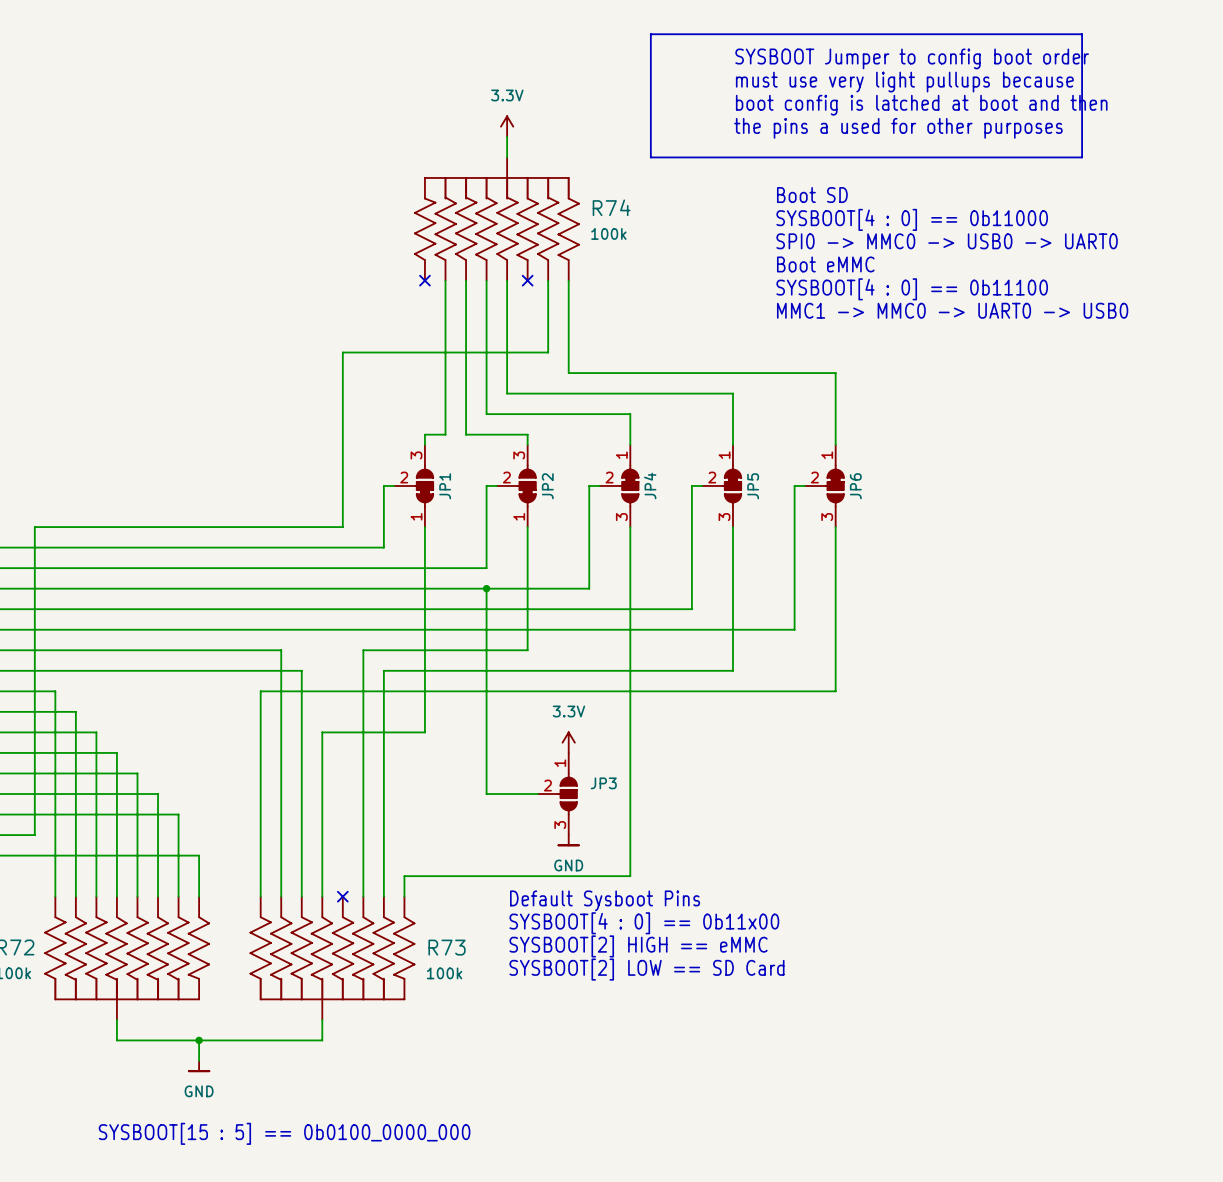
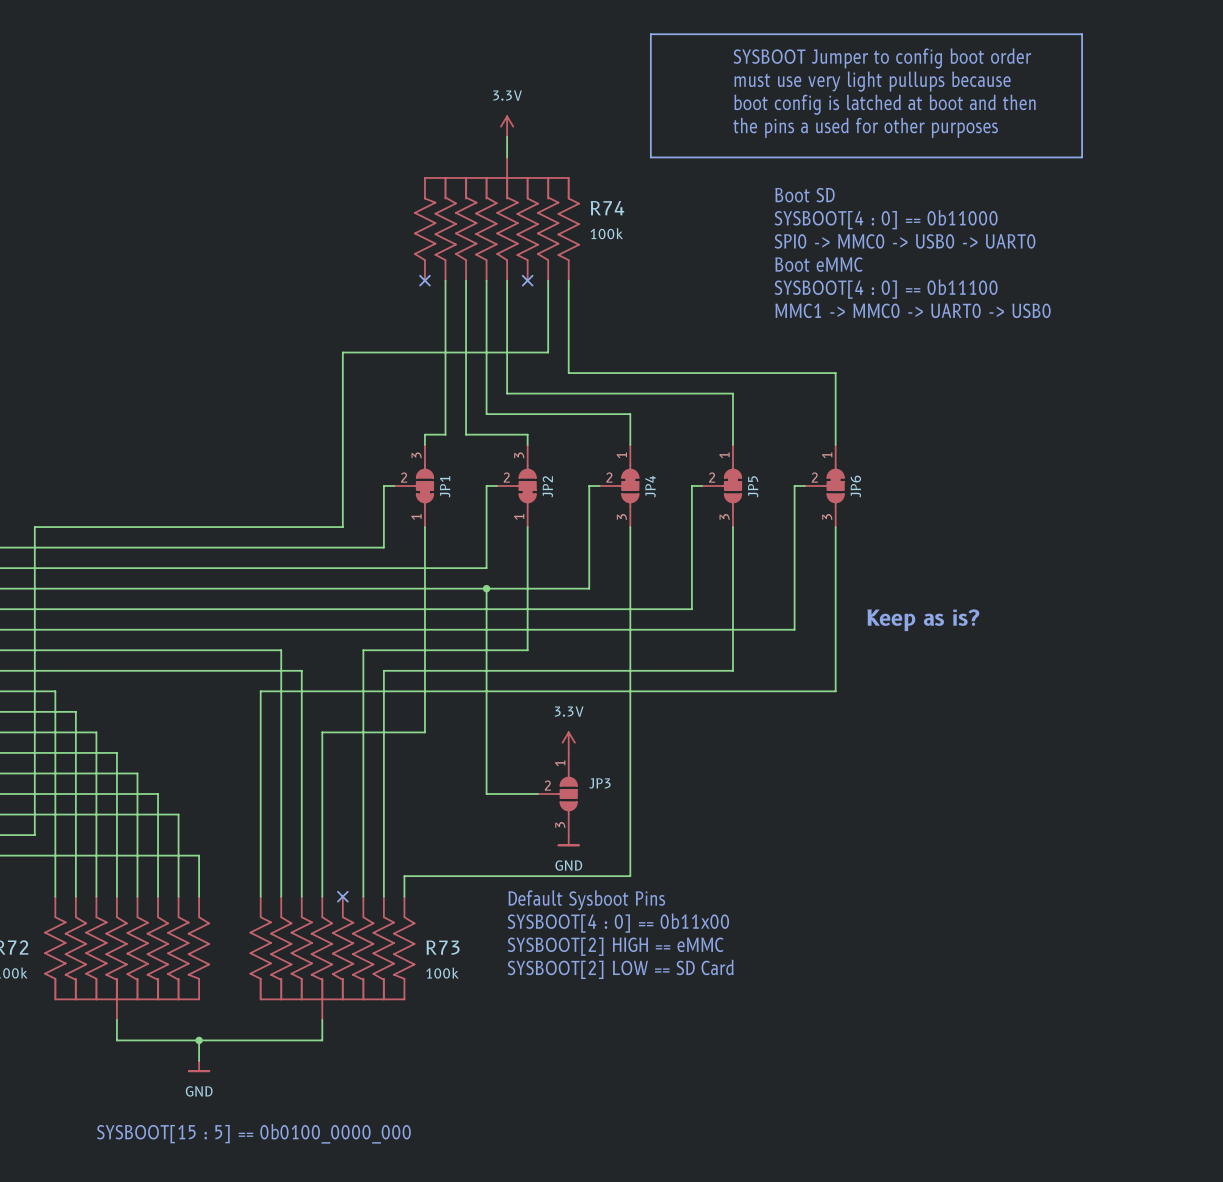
text: none -> Keep as is? (923, 620)

